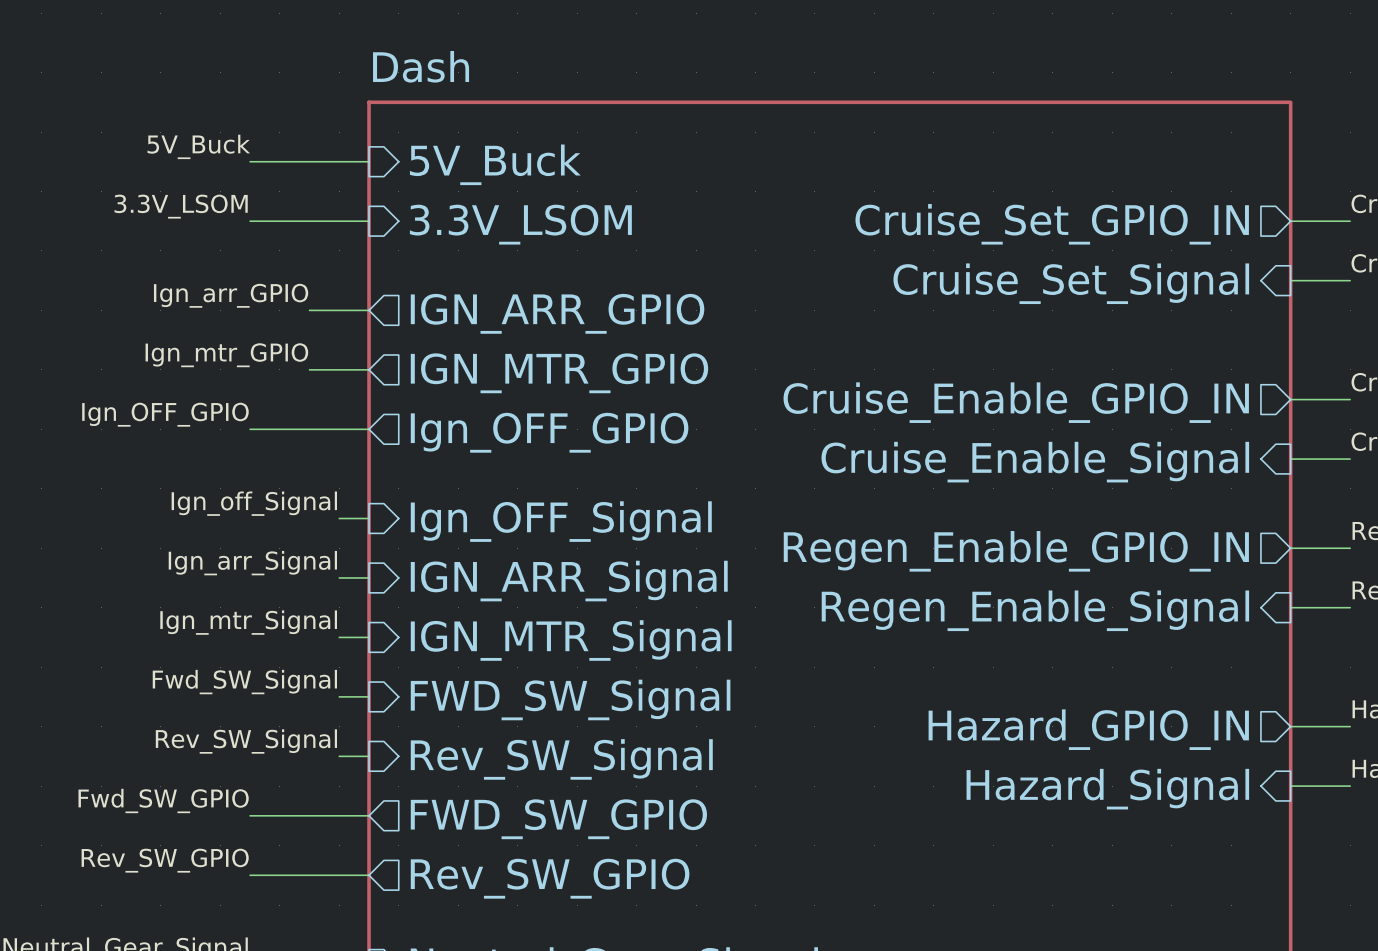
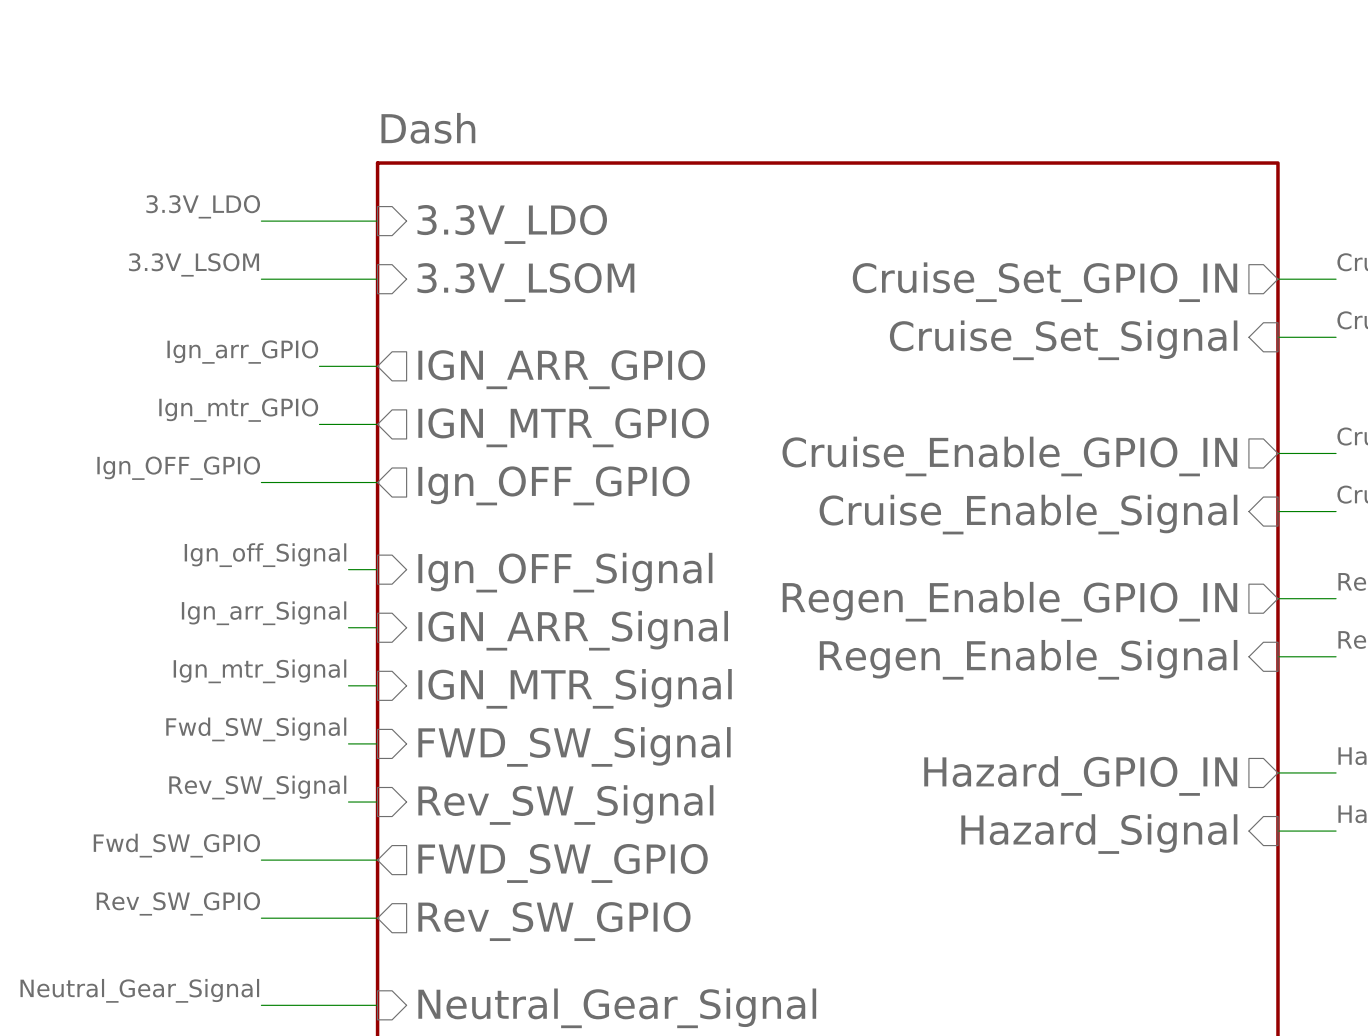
label: 5V_Buck (198, 146) -> 3.3V_LDO (203, 206)
sheet pin: 5V_Buck (495, 164) -> 3.3V_LDO (512, 224)

